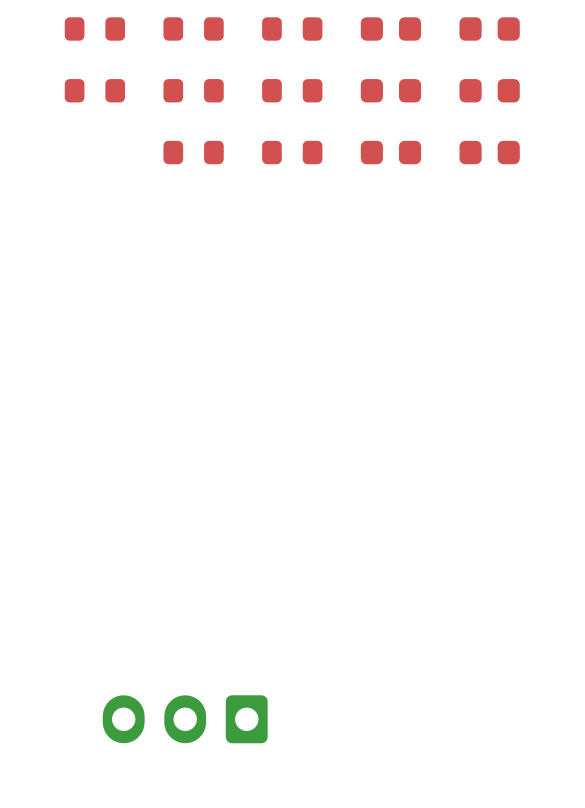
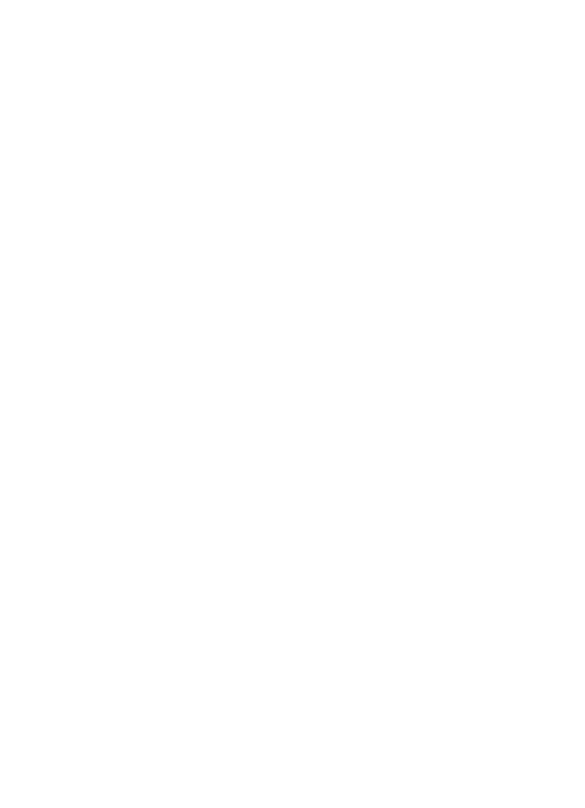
part: (94, 28) -> none
part: (193, 28) -> none
part: (292, 28) -> none
part: (390, 28) -> none
part: (489, 28) -> none
part: (94, 90) -> none
part: (193, 90) -> none
part: (292, 90) -> none
part: (390, 90) -> none
part: (489, 90) -> none
part: (193, 152) -> none
part: (292, 152) -> none
part: (390, 152) -> none
part: (489, 152) -> none
part: (185, 719) -> none

